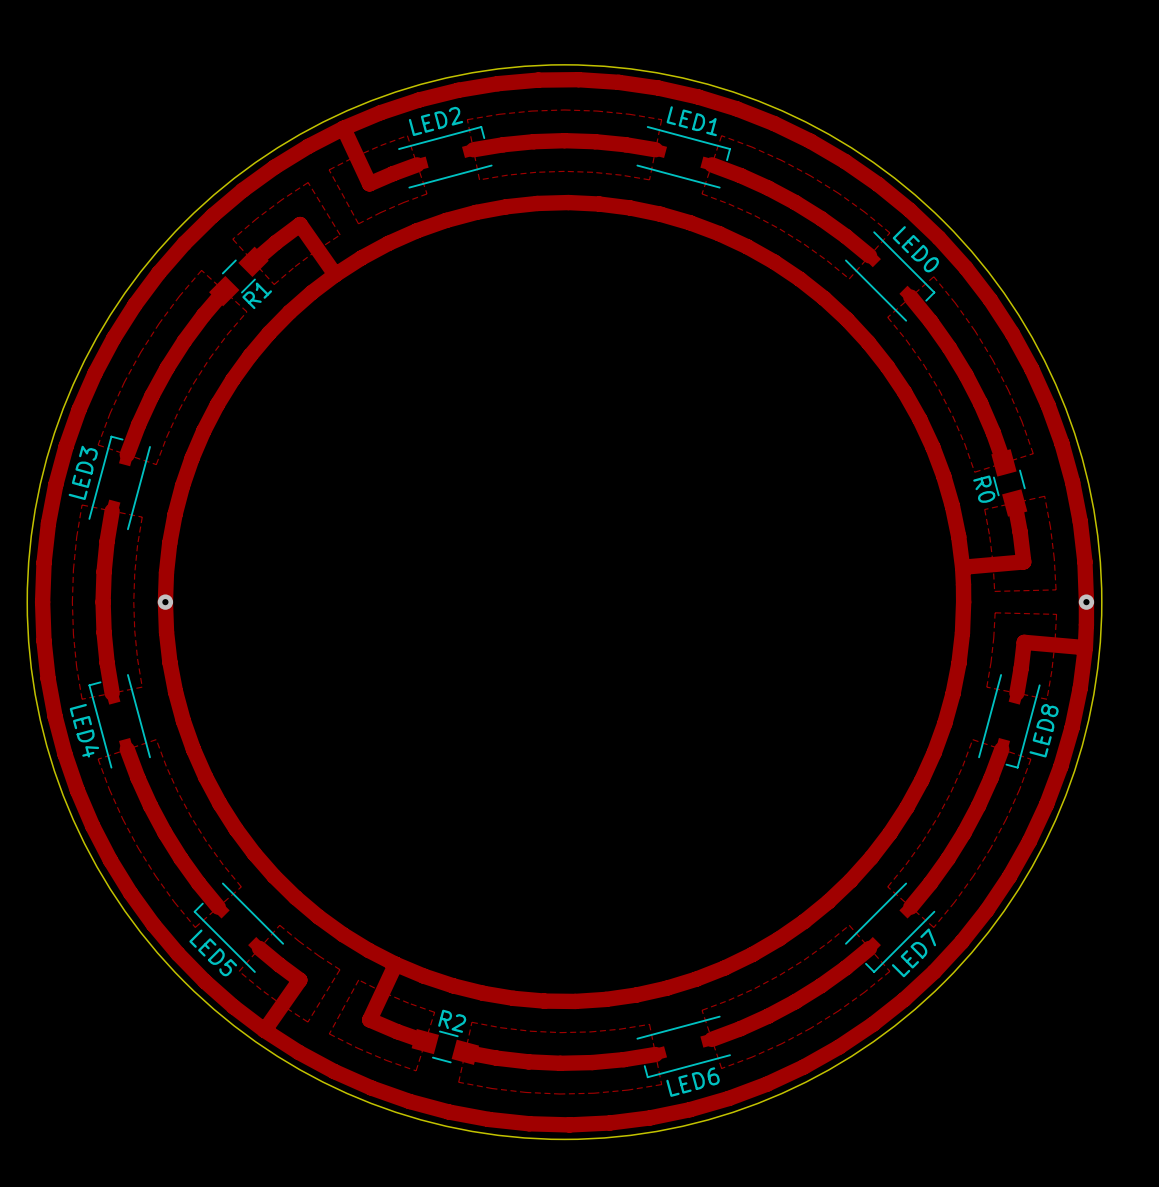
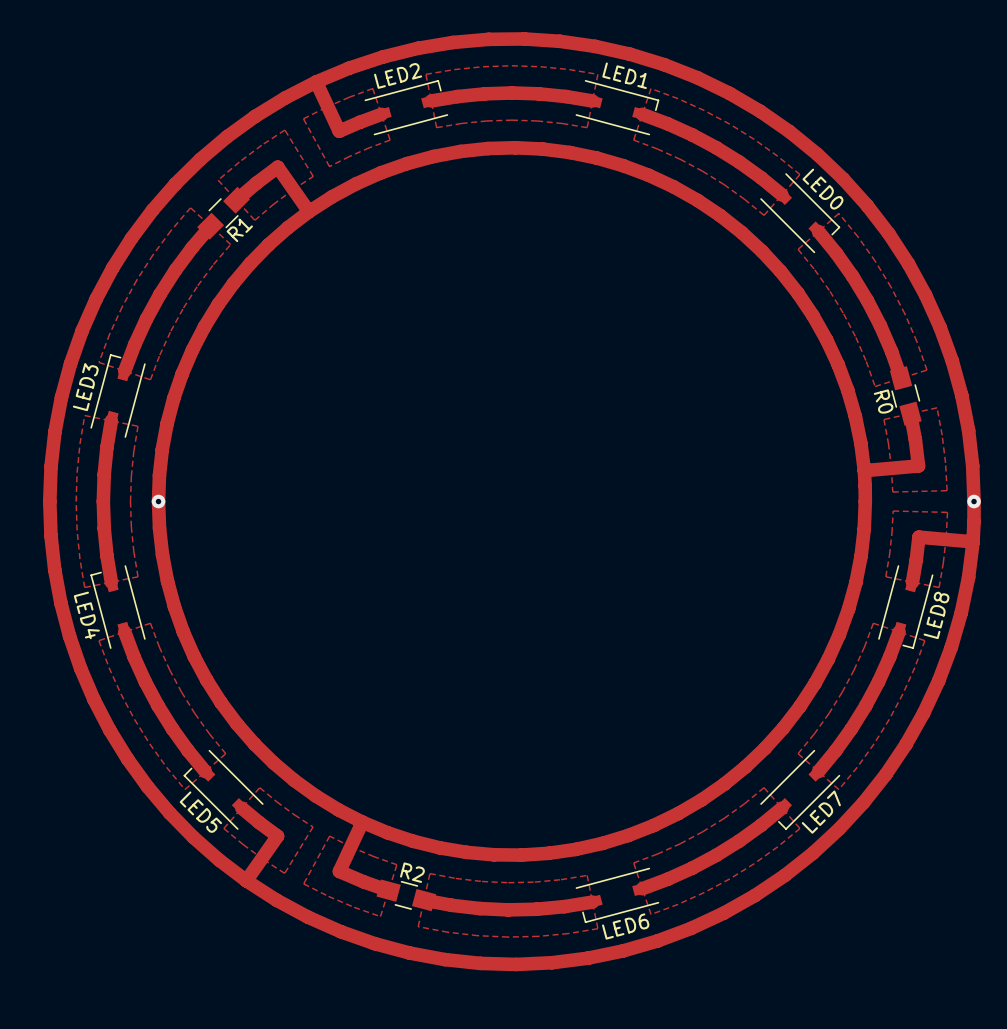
round board edge: [26, 64, 1103, 1141] -> none

